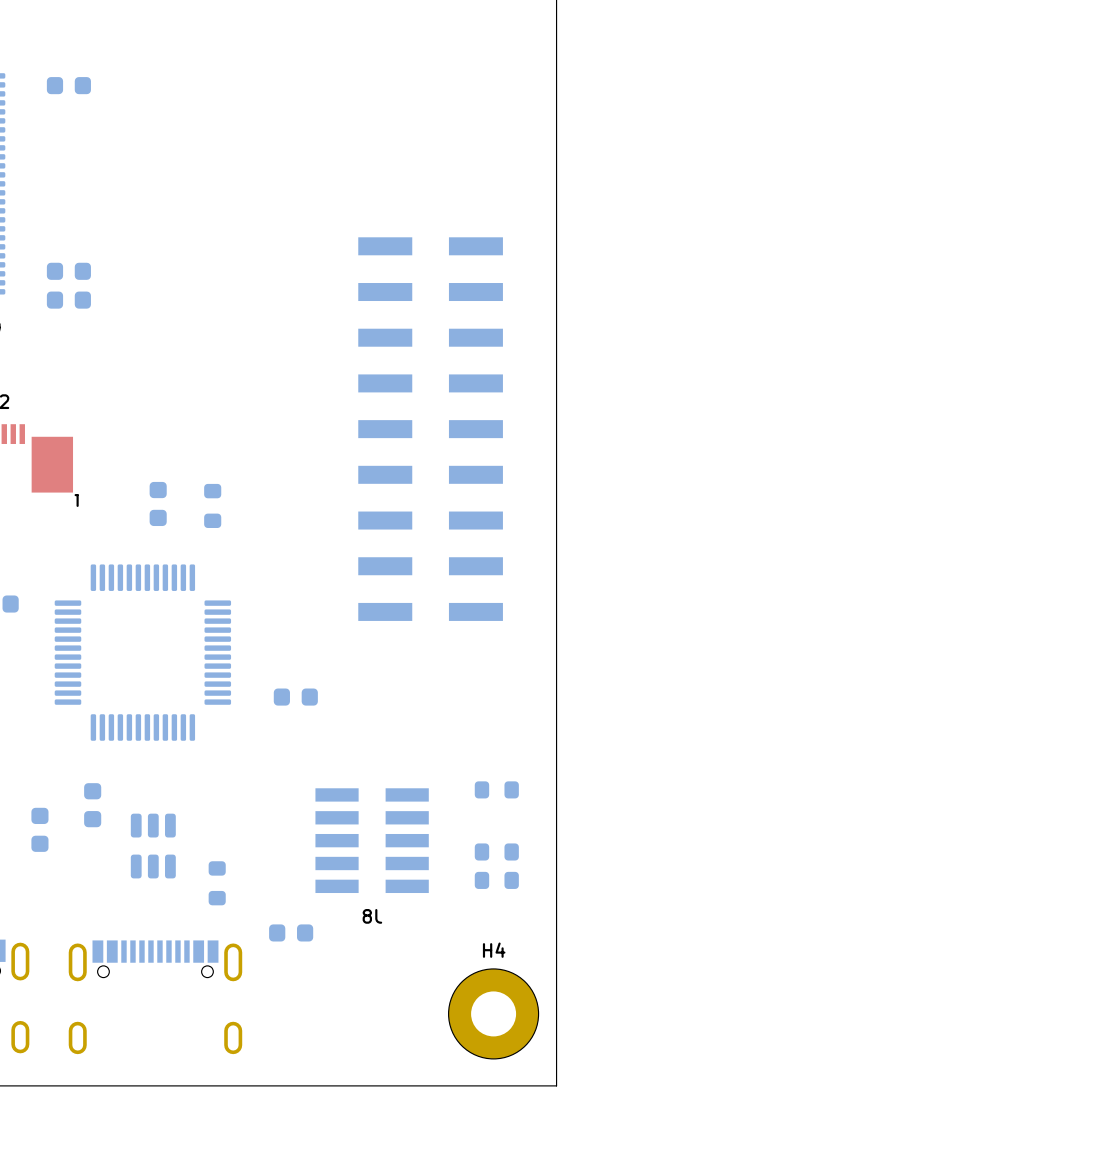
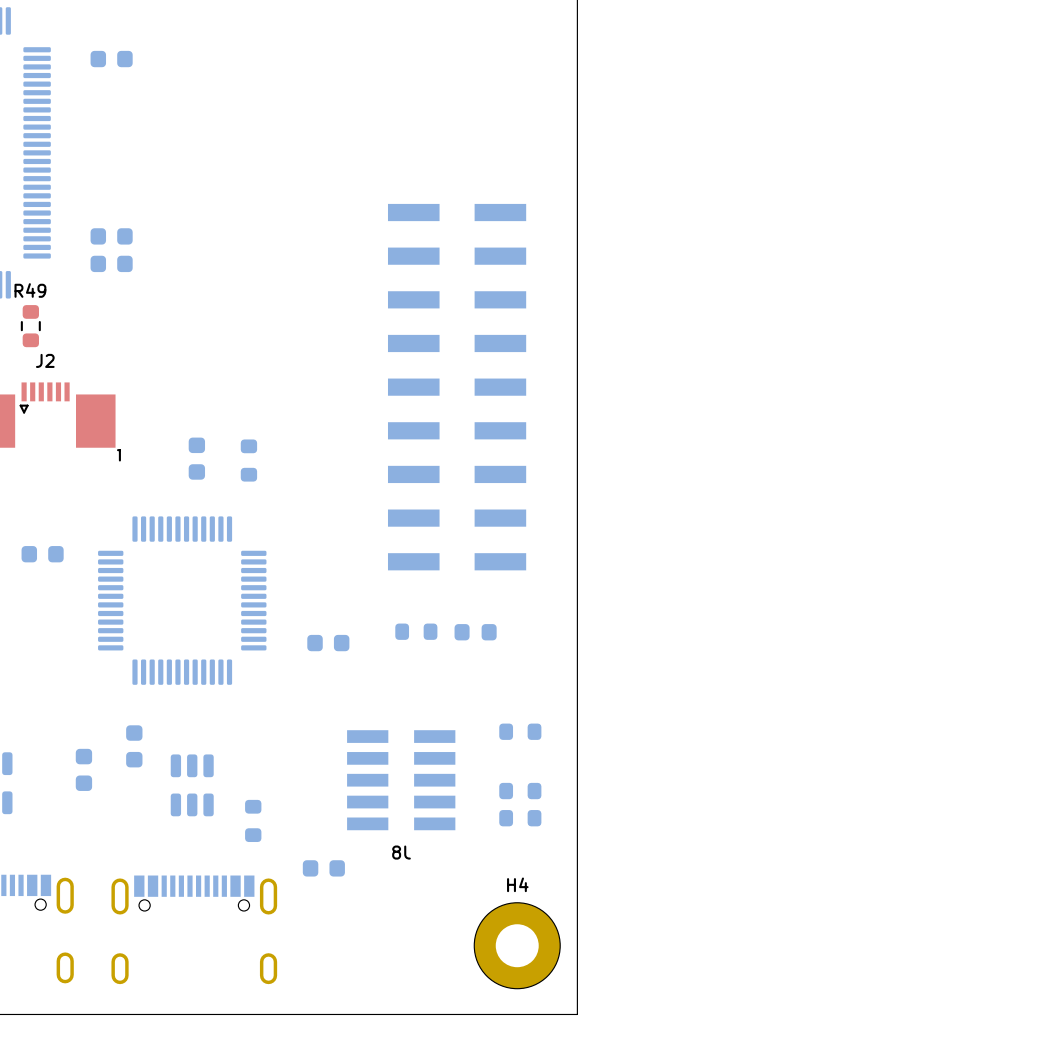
part: none -> (416, 631)
part: none -> (475, 632)

